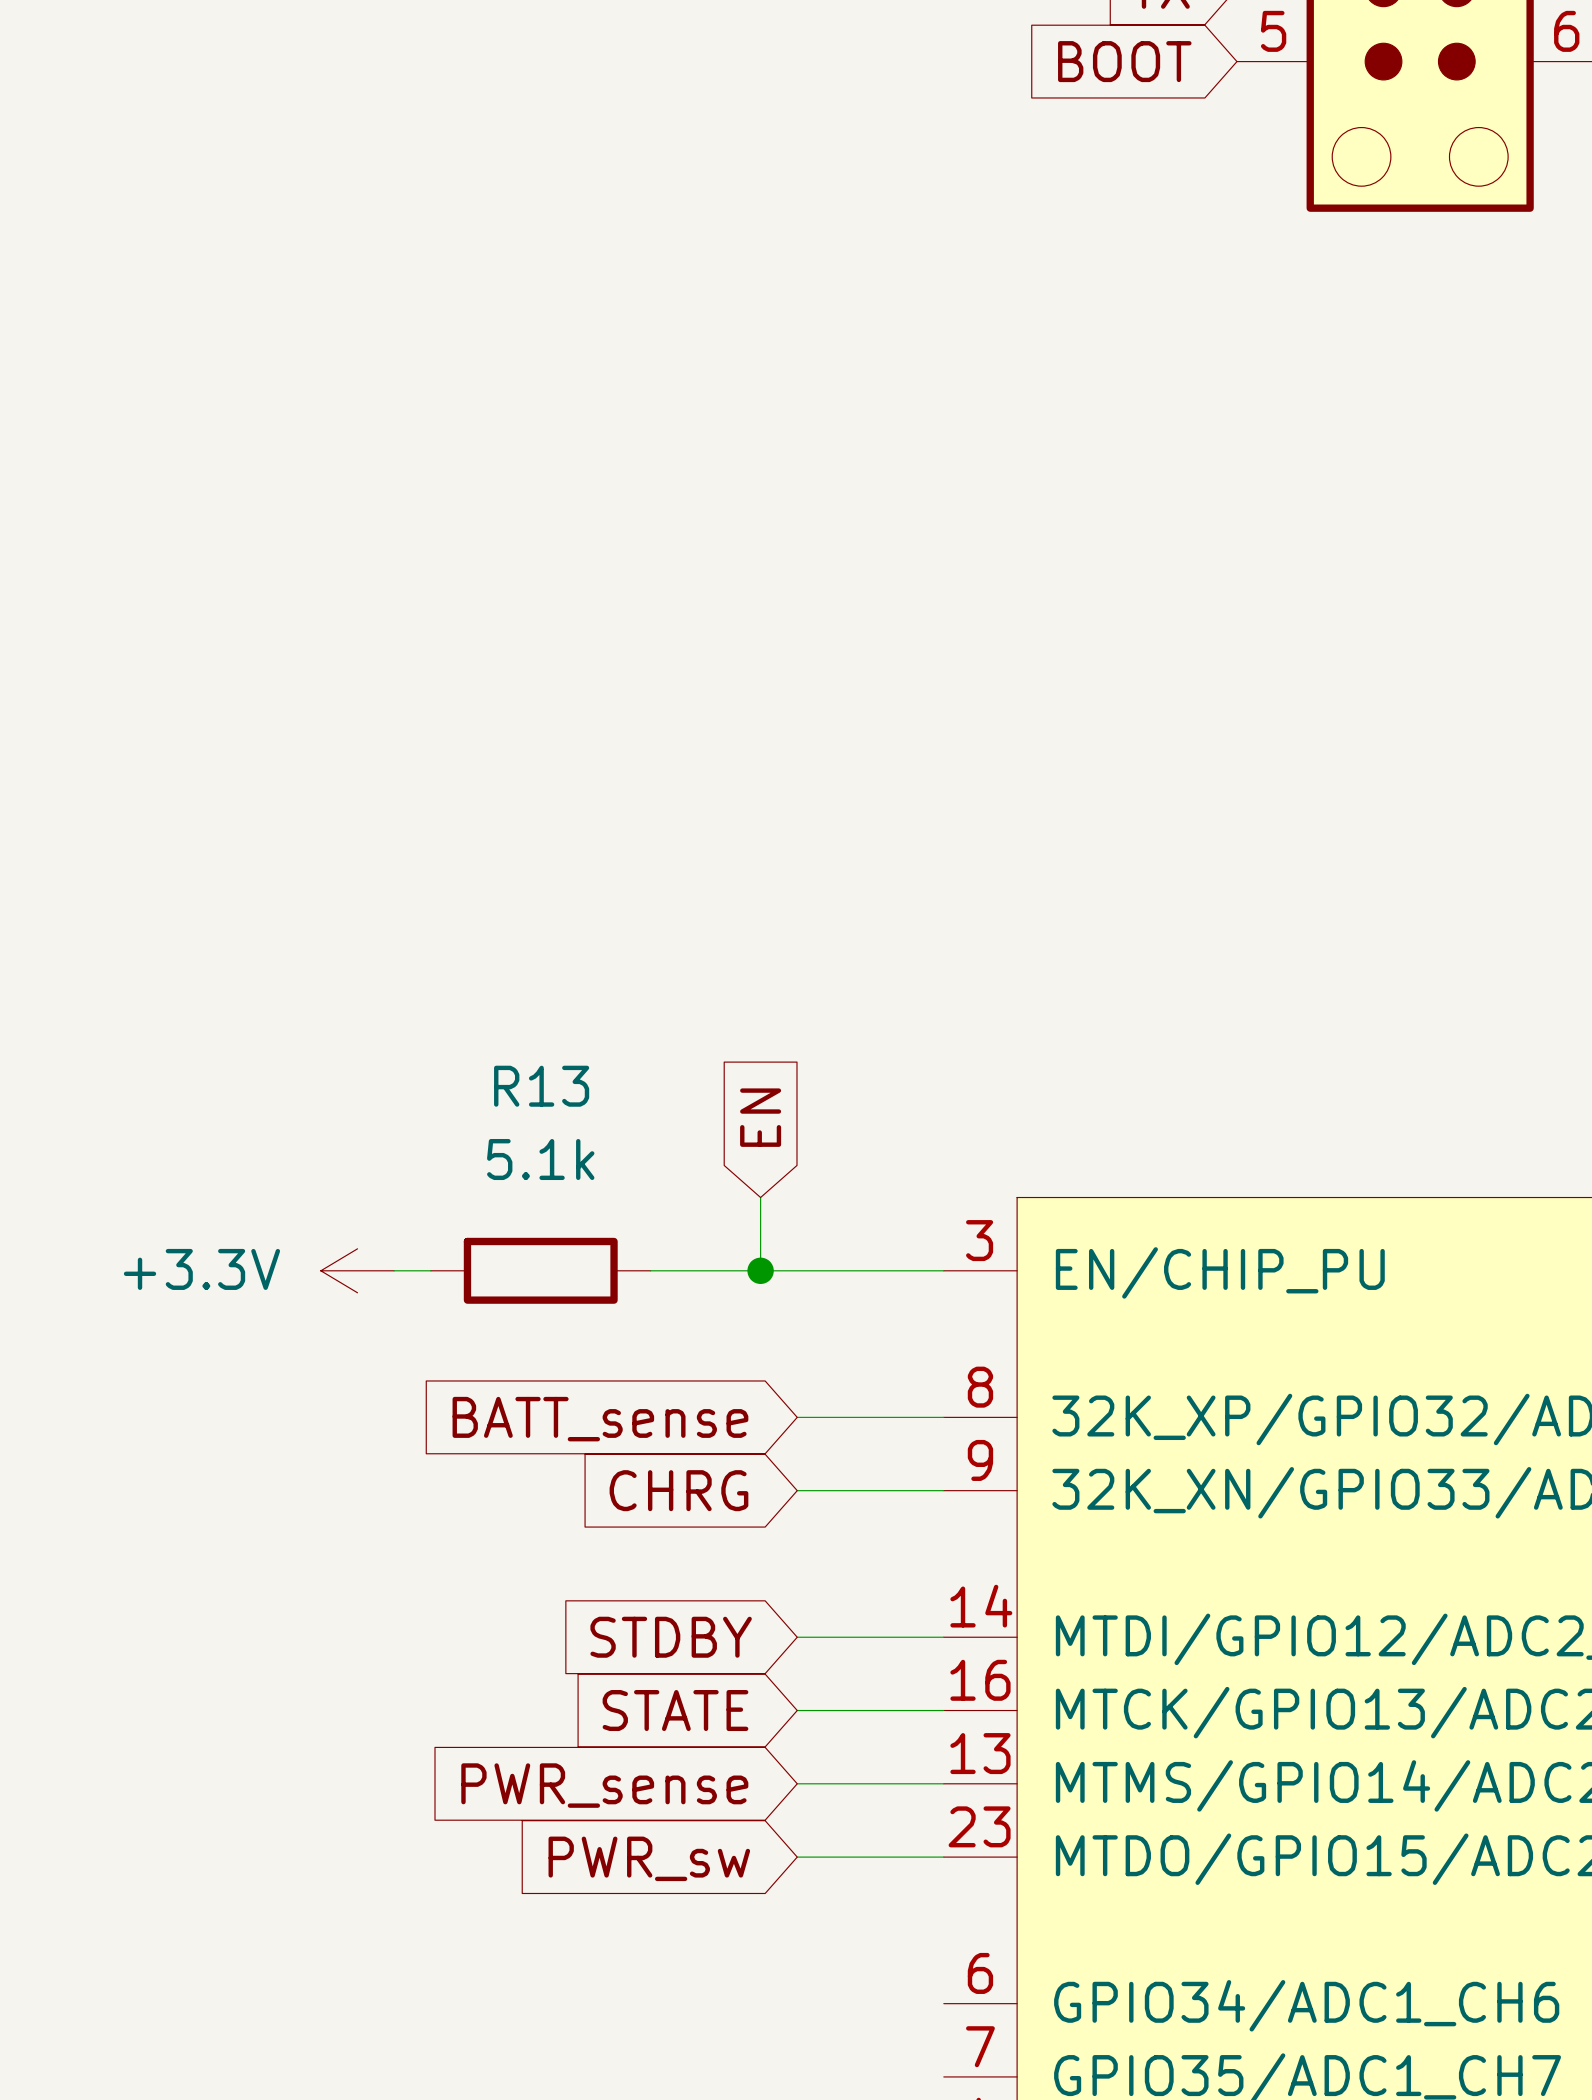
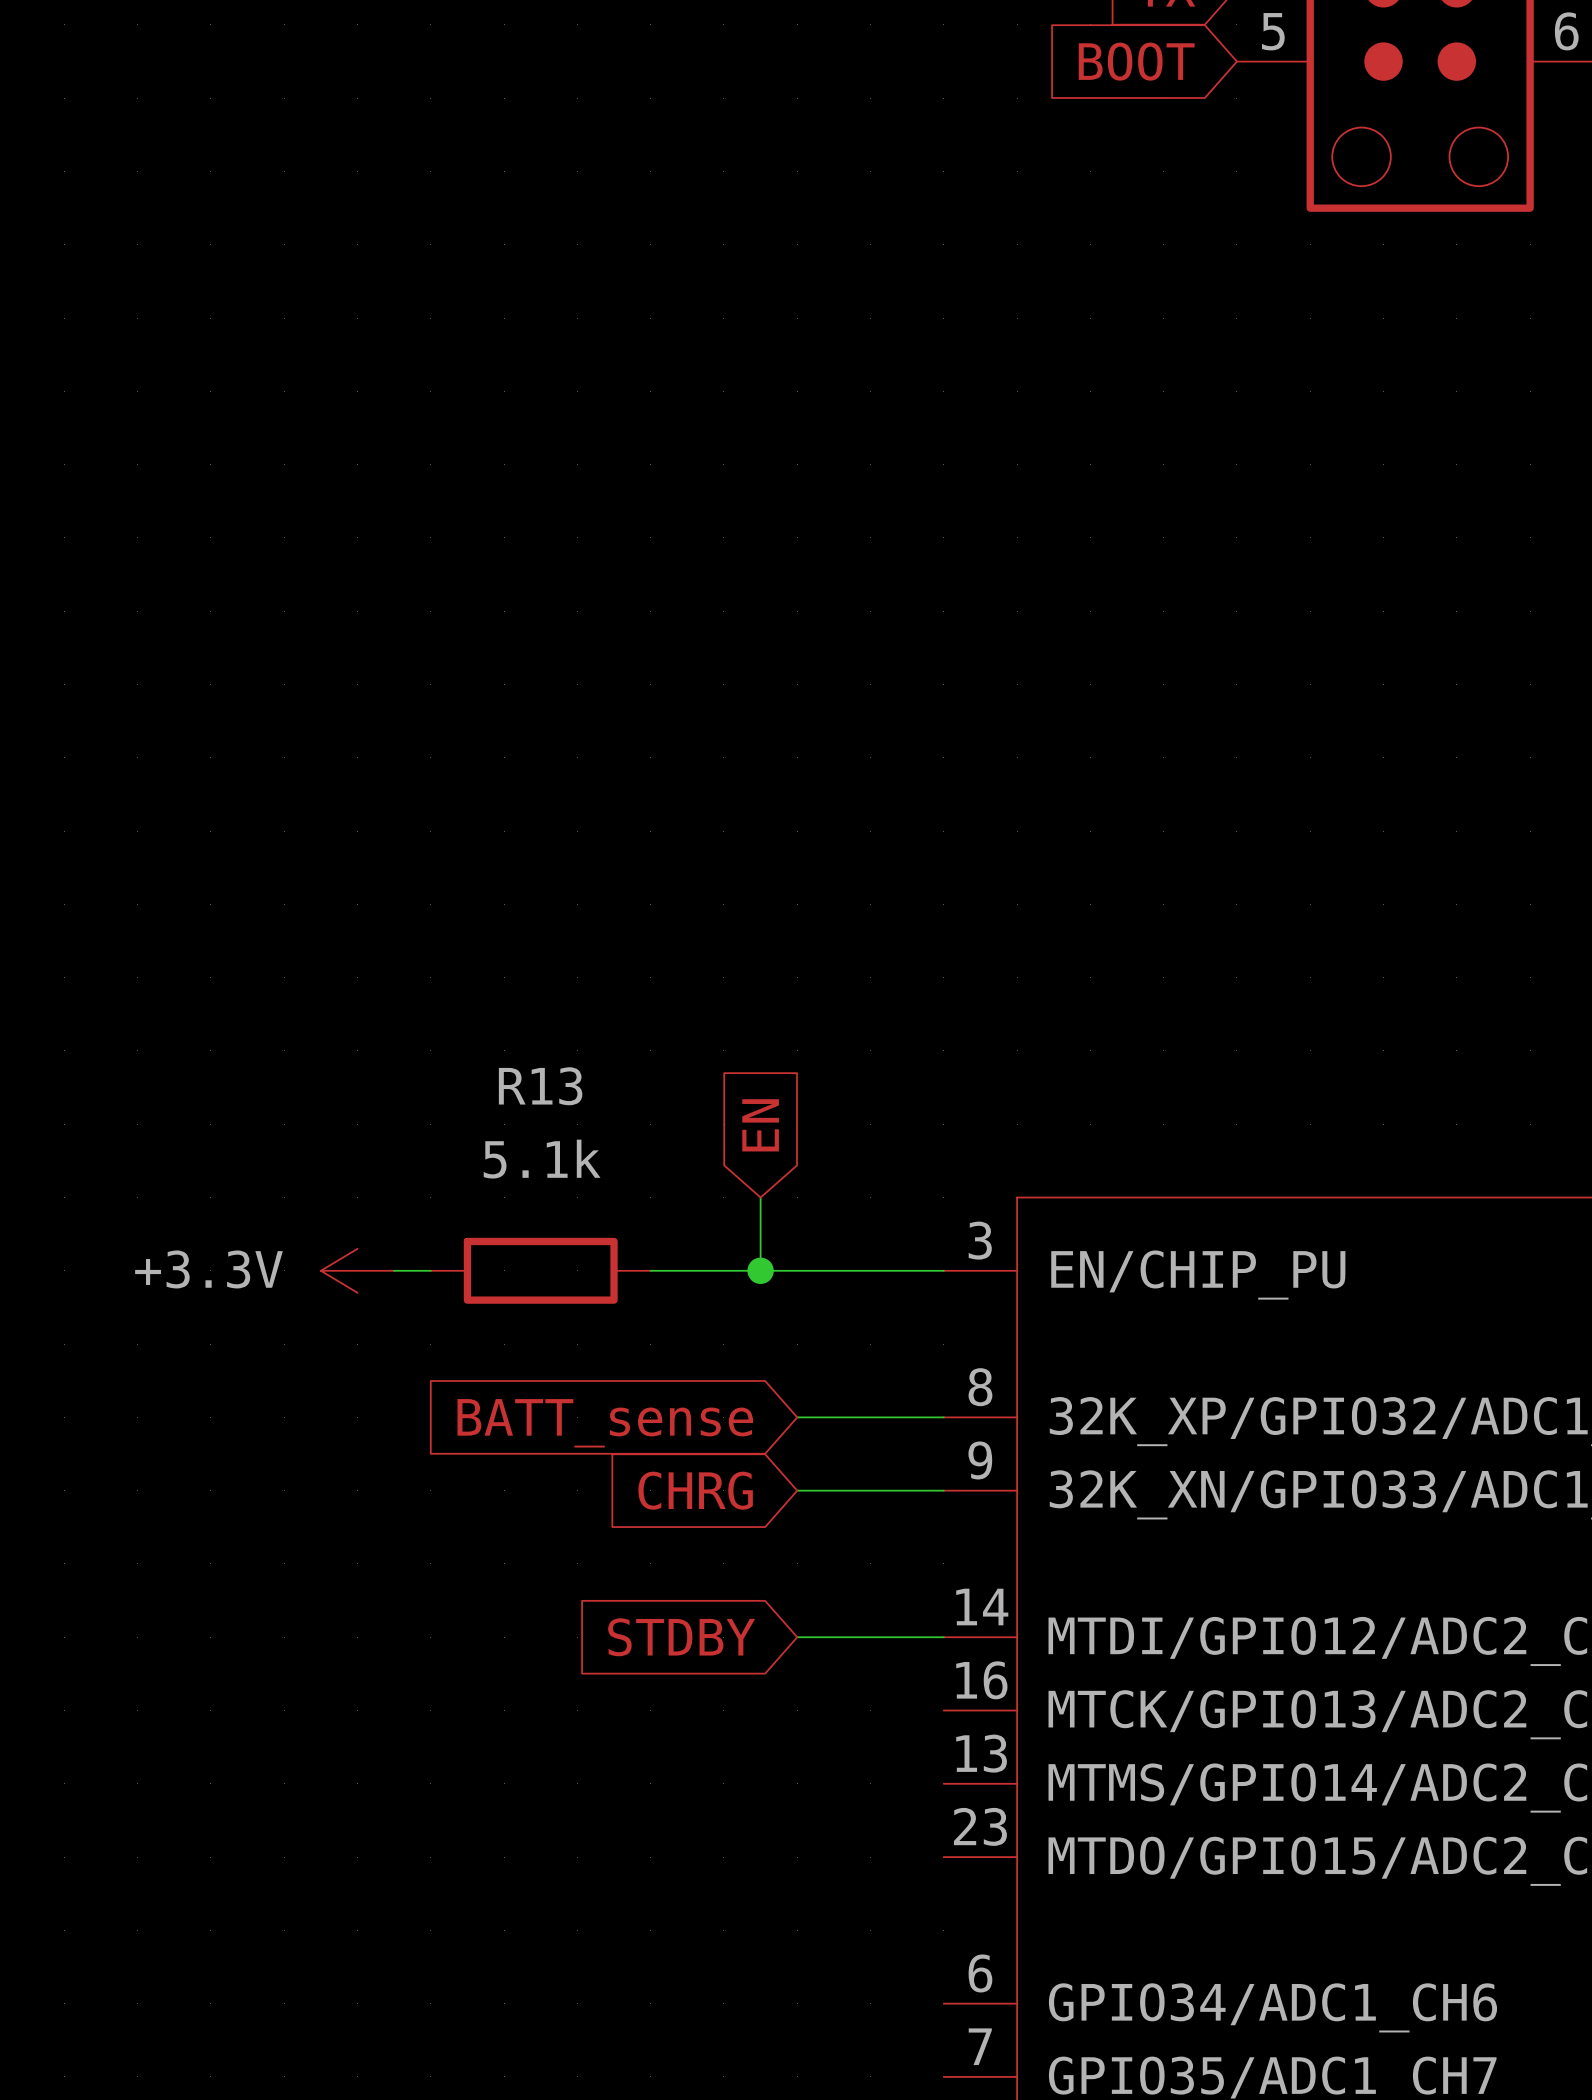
global label: STATE (675, 1710) -> none
wire: (797, 1710) (943, 1710) -> none
wire: (797, 1783) (943, 1783) -> none
global label: PWR_sense (604, 1785) -> none
wire: (797, 1857) (943, 1857) -> none
global label: PWR_sw (649, 1858) -> none

